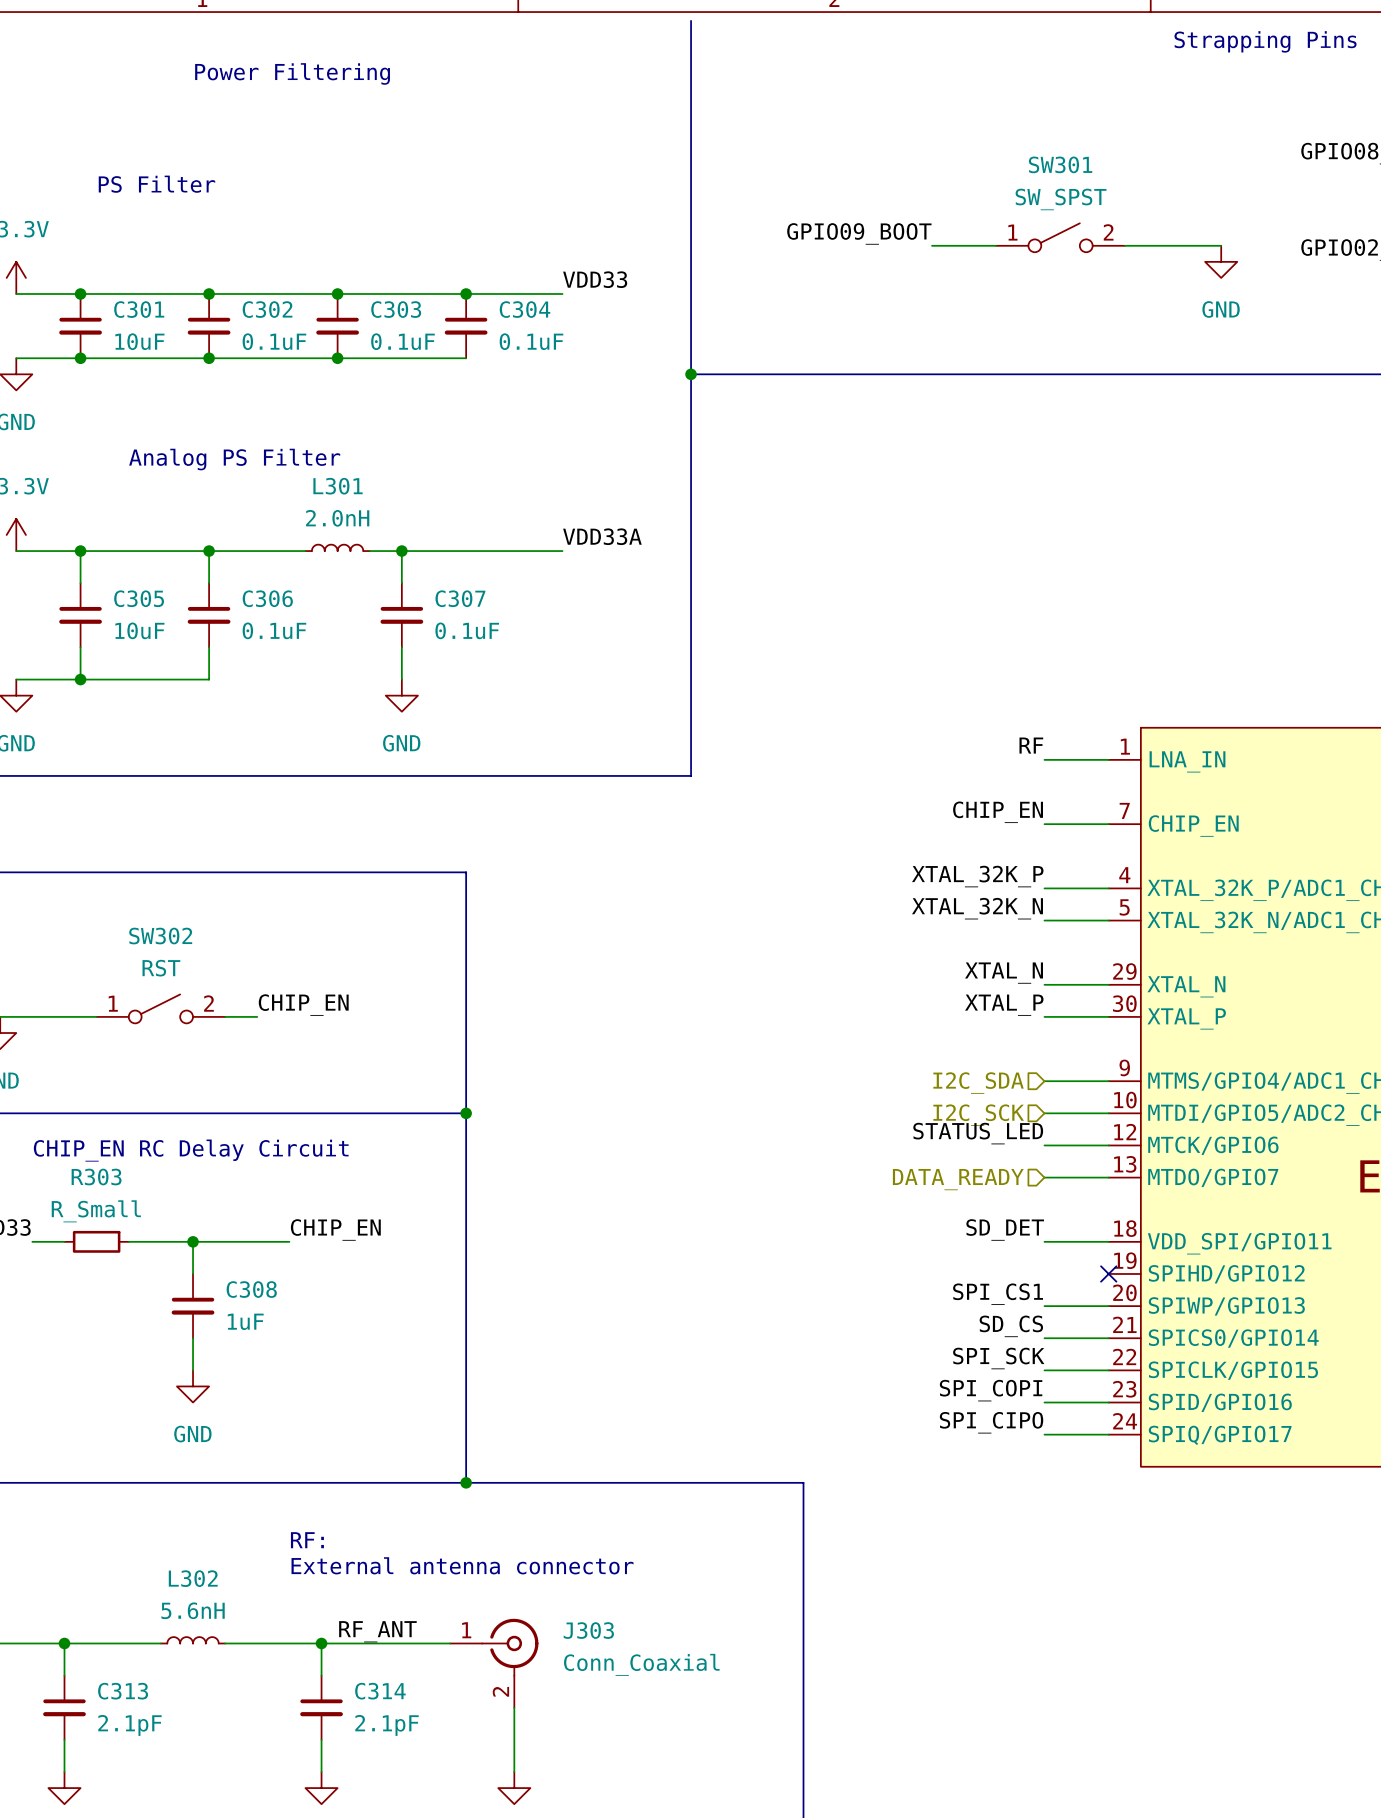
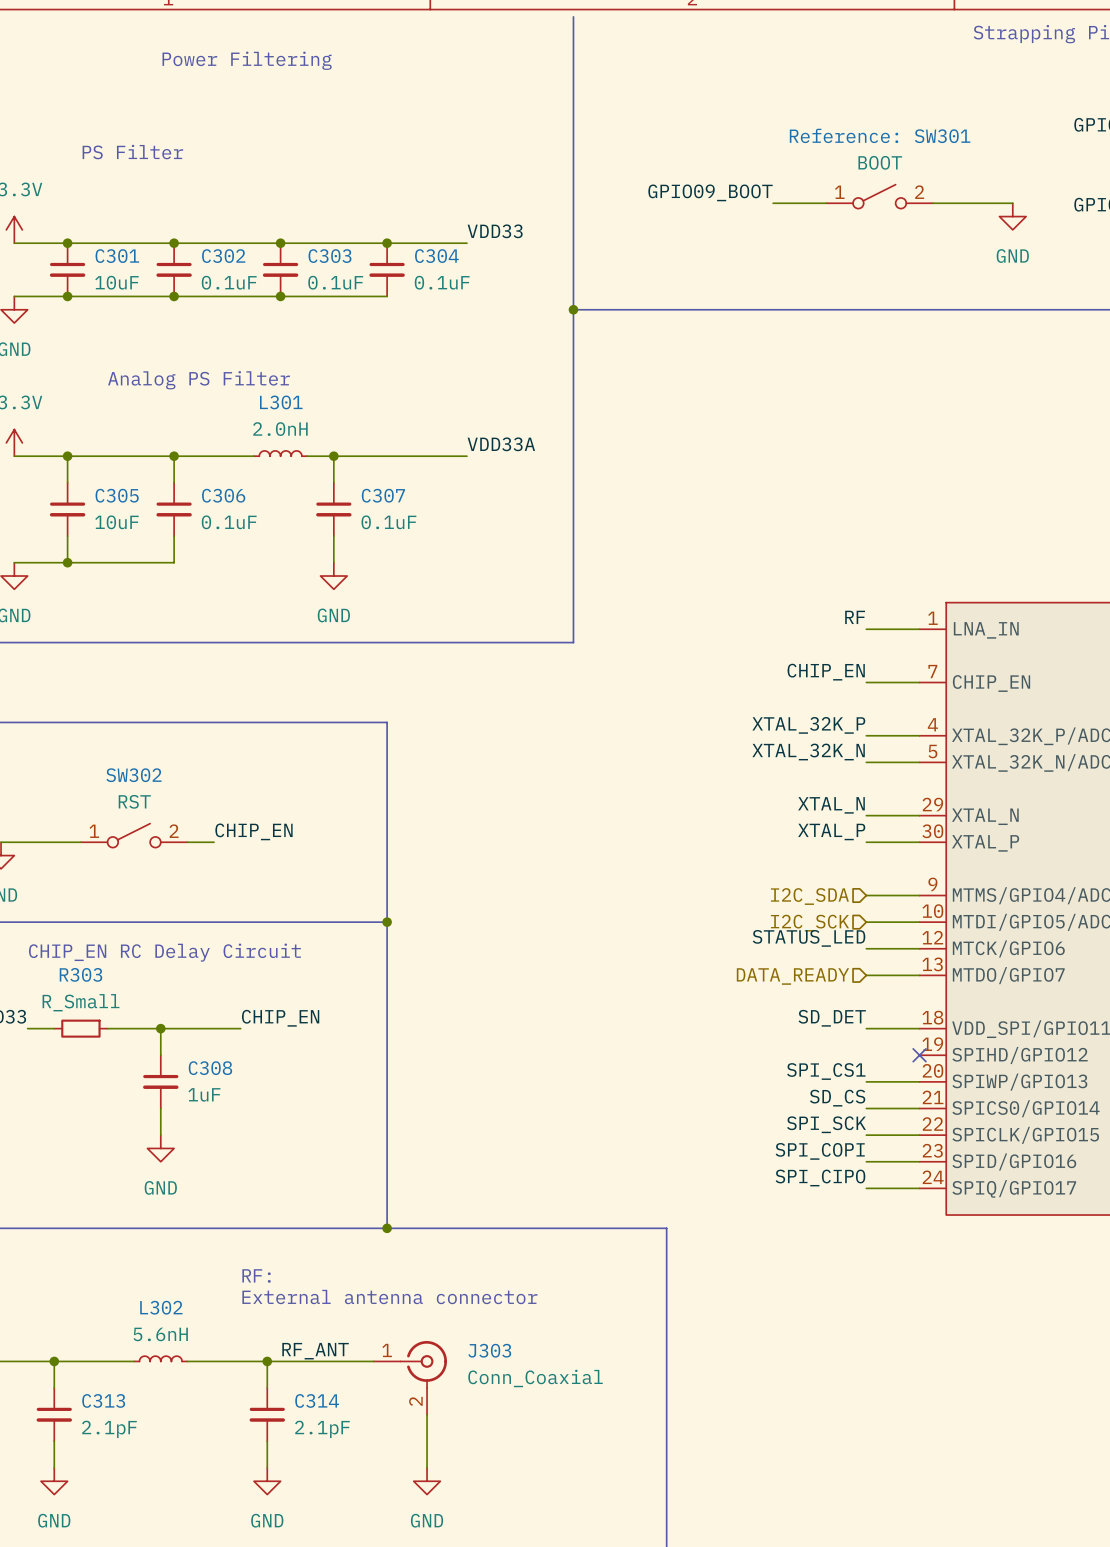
SW301 name: SW301 (1060, 164) -> Reference: SW301 (880, 135)
SW301 value: SW_SPST (1061, 199) -> BOOT (880, 162)

